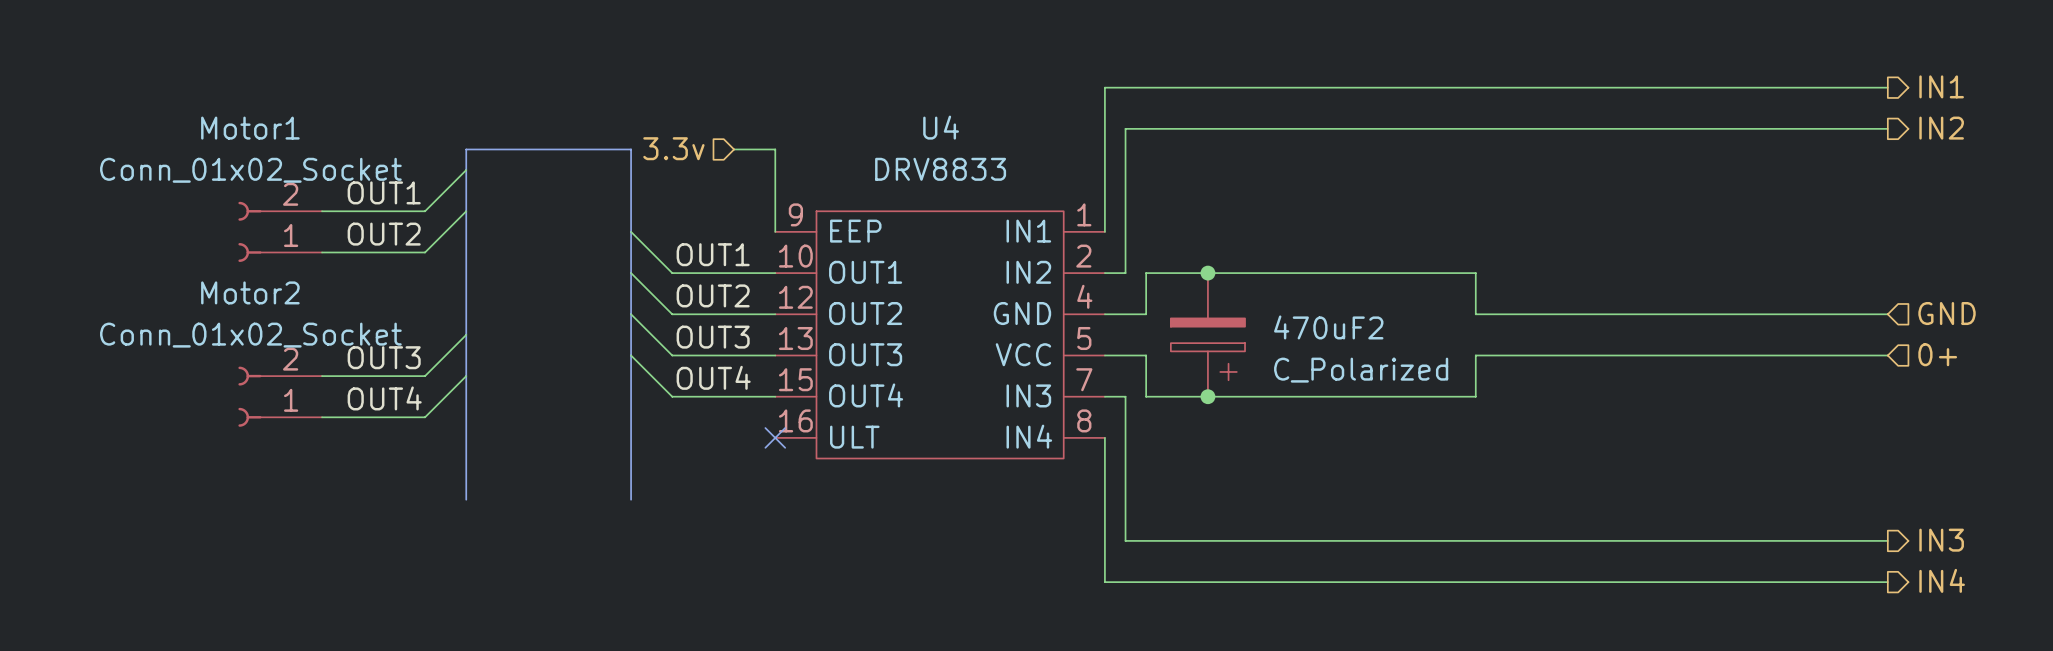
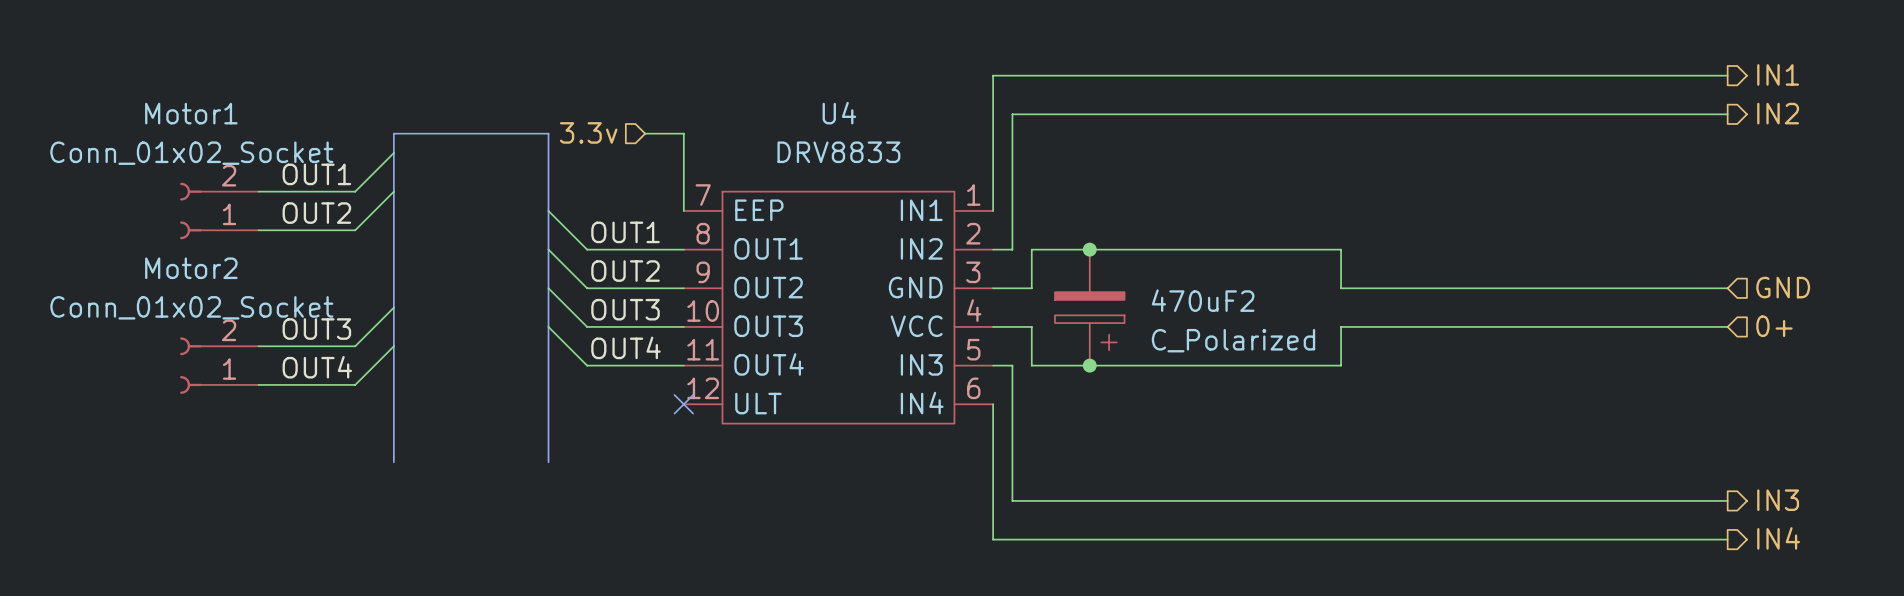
U4 symbol: [775, 211, 1105, 459] -> [683, 191, 994, 424]

